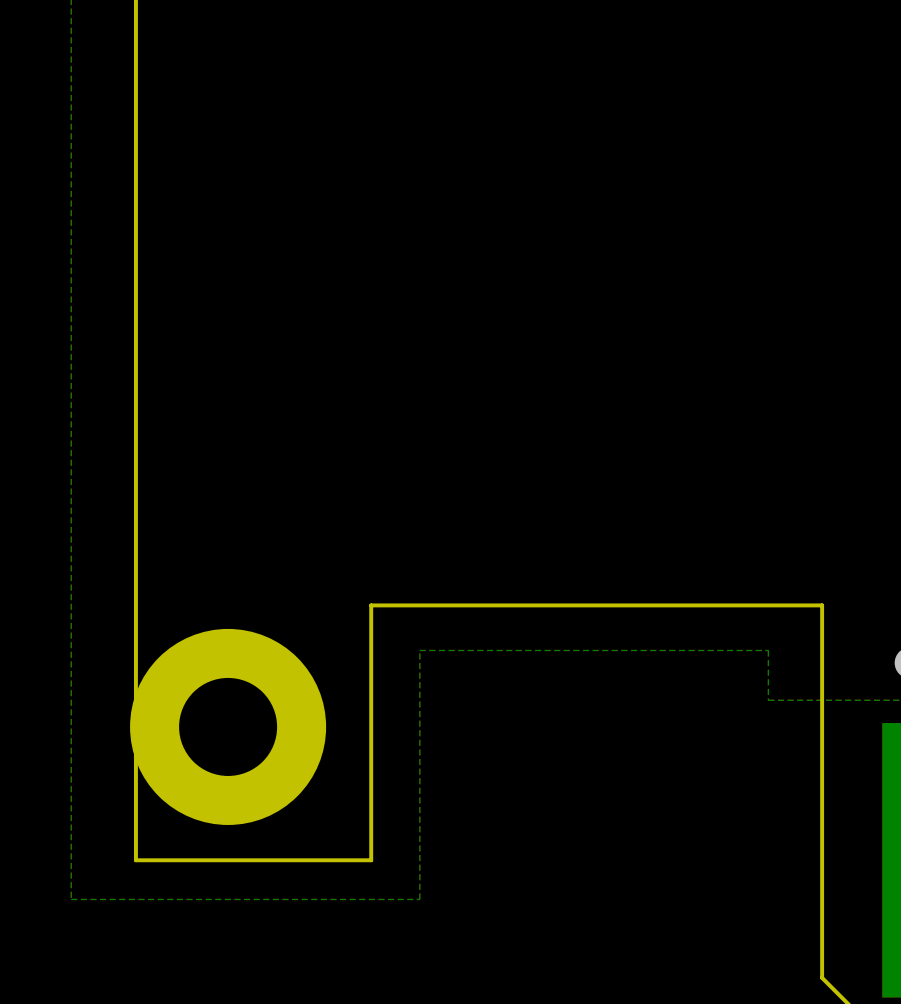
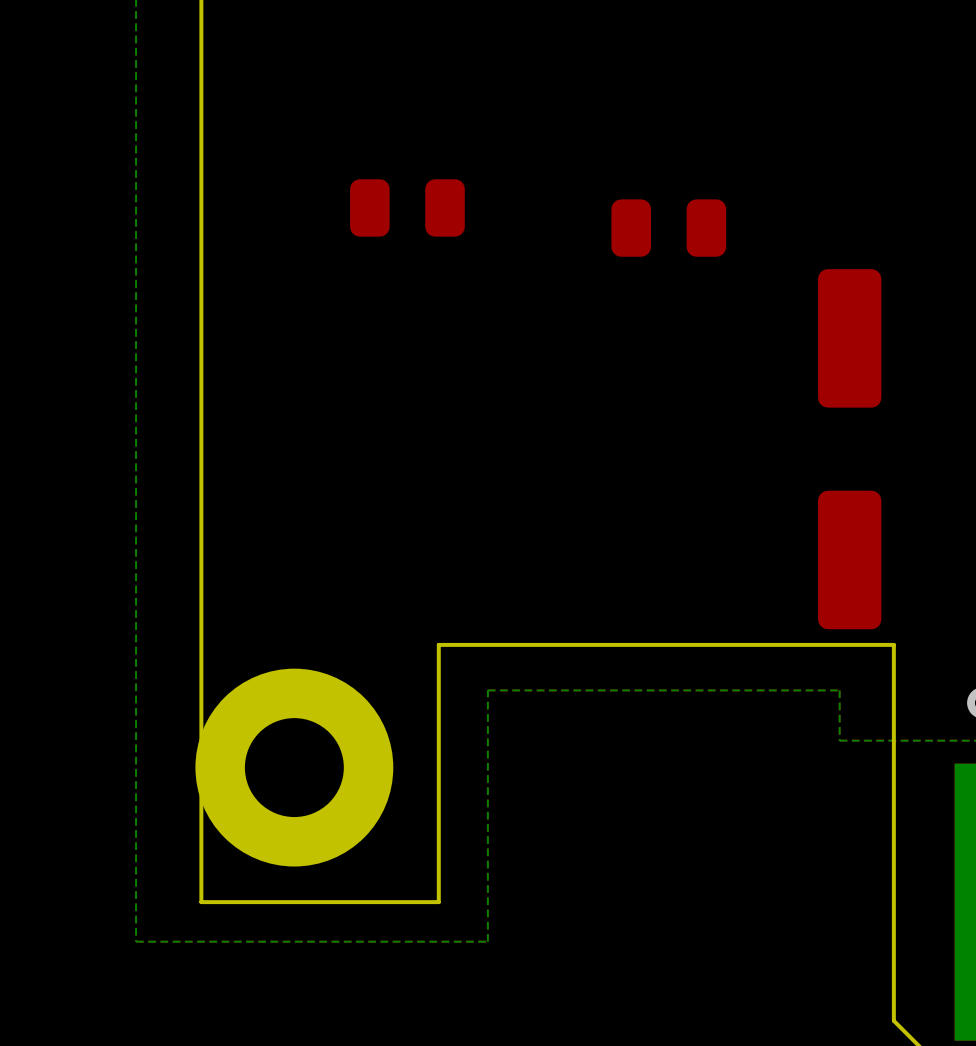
part: none -> (407, 207)
part: none -> (668, 228)
part: none -> (849, 449)

